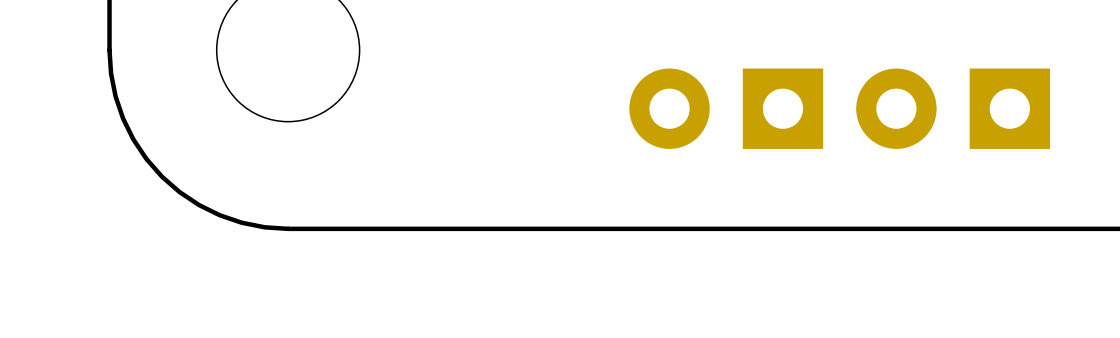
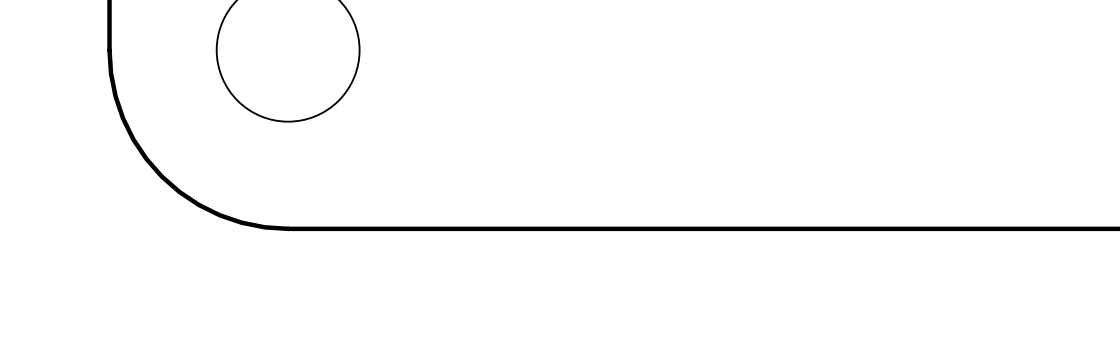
part: (726, 108) -> none
part: (953, 108) -> none

